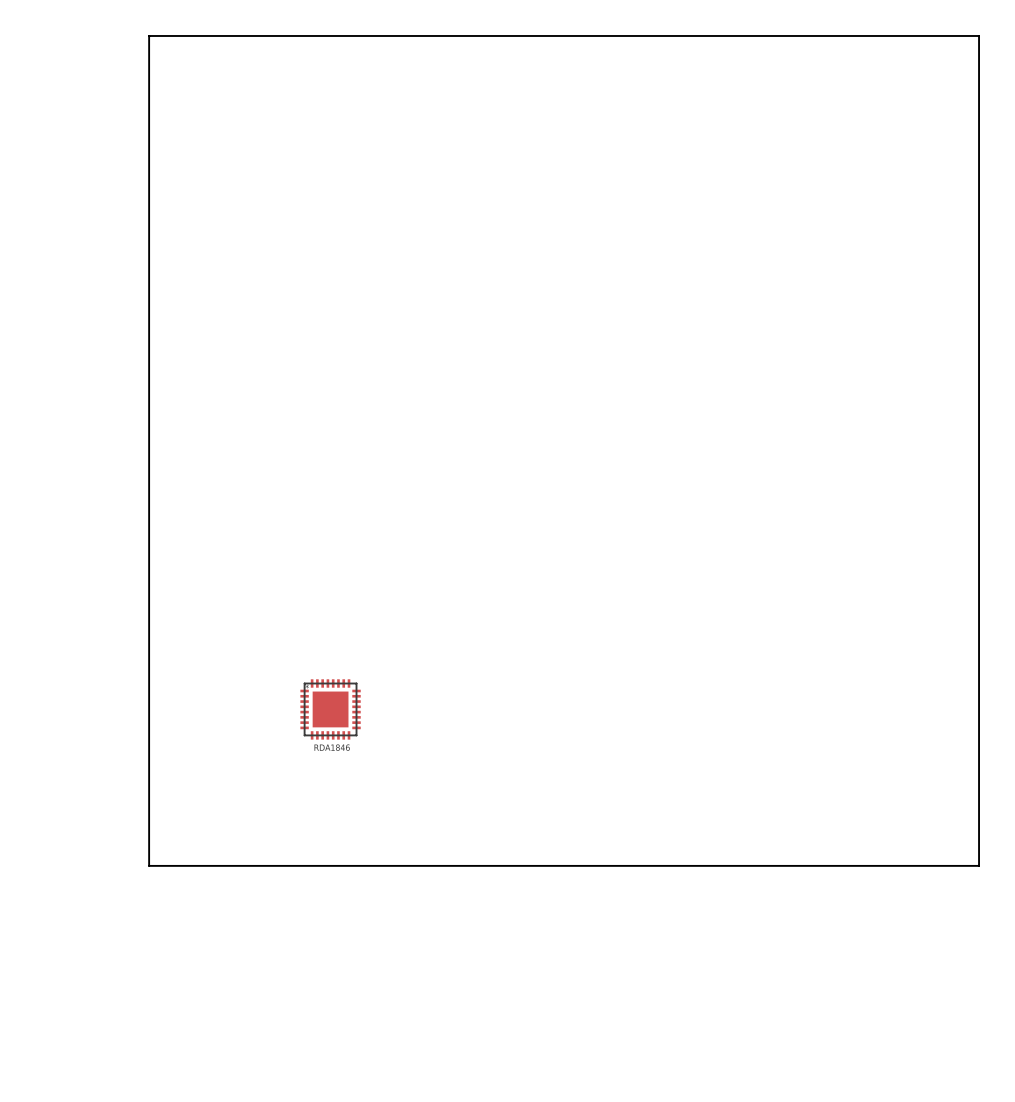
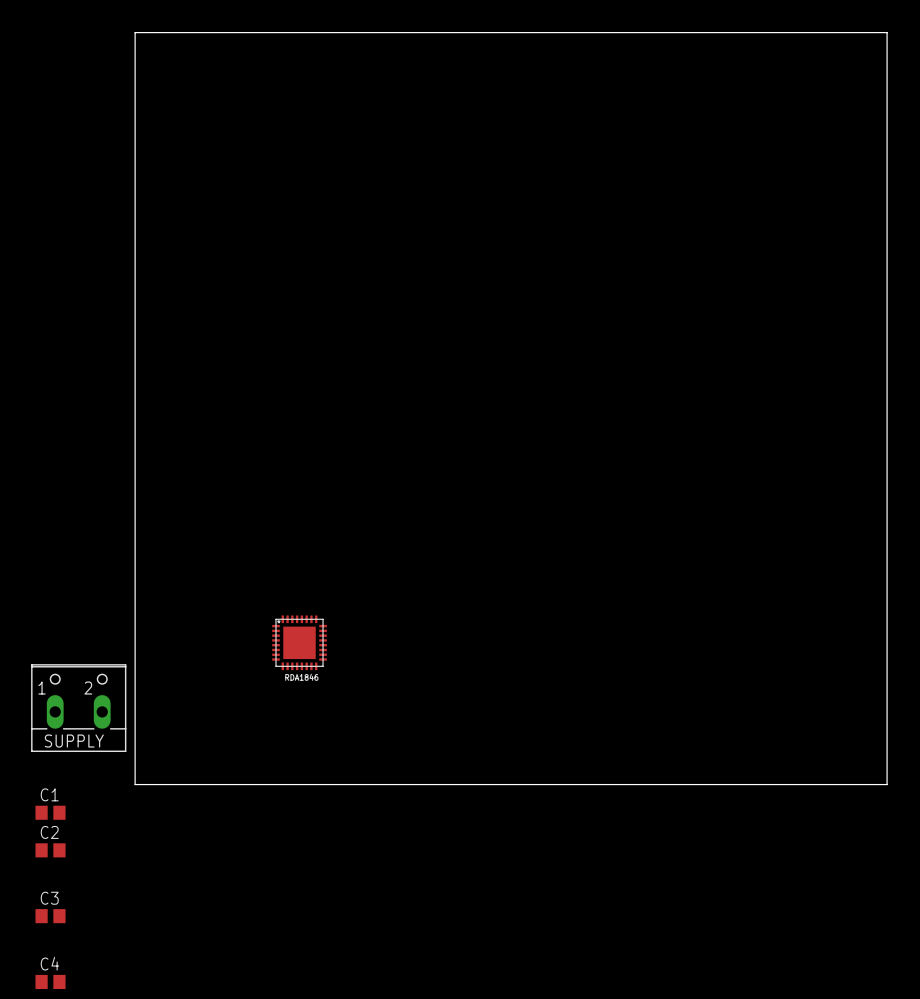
SUPPLY: none -> (78, 708)
C1: none -> (50, 812)
C2: none -> (50, 850)
C3: none -> (50, 916)
C4: none -> (50, 981)

